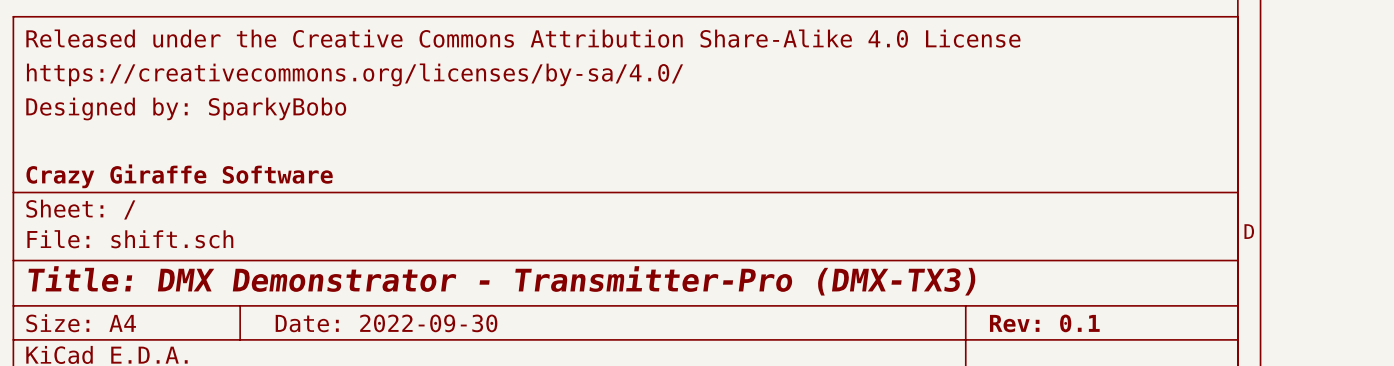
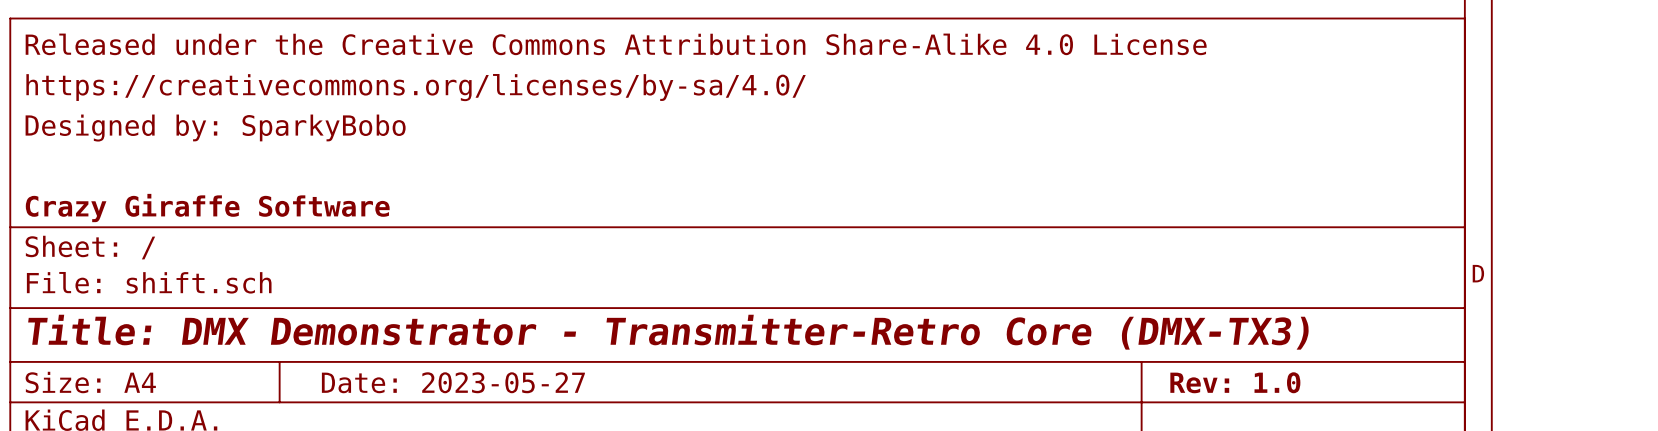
title block: Title: DMX Demonstrator - Transmitter-Pro (DMX-TX3) (501, 280) -> Title: DMX Demonstrator - Transmitter-Retro Core (DMX-TX3) (668, 332)
title block: Date: 2022-09-30 (386, 323) -> Date: 2023-05-27 (453, 382)
title block: Rev: 0.1 (1044, 323) -> Rev: 1.0 (1235, 382)

